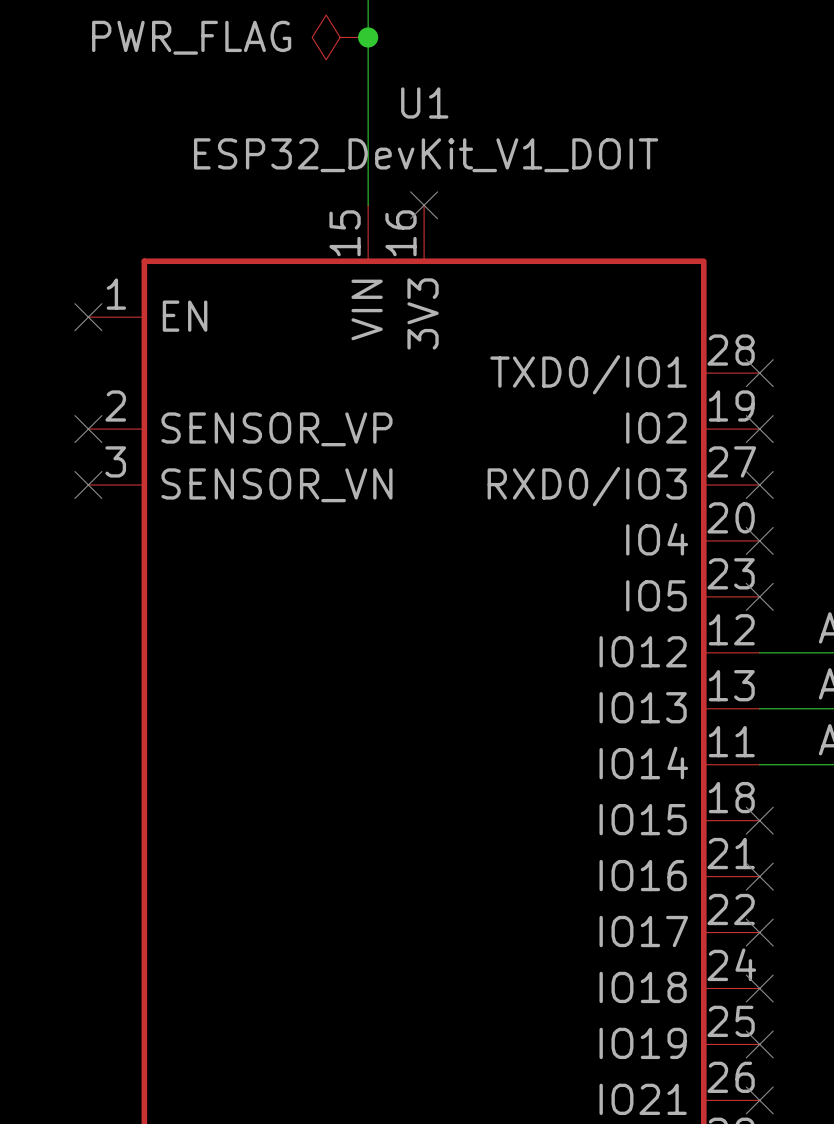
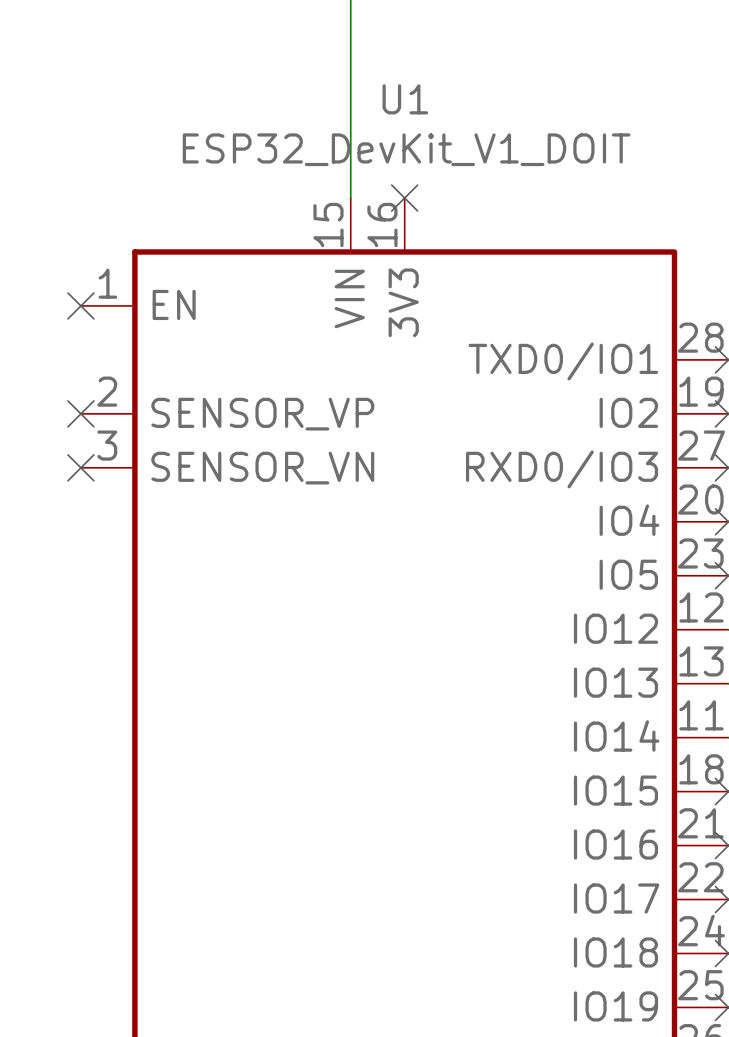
power symbol: PWR_FLAG (340, 37) -> none
junction: (368, 37) -> none

